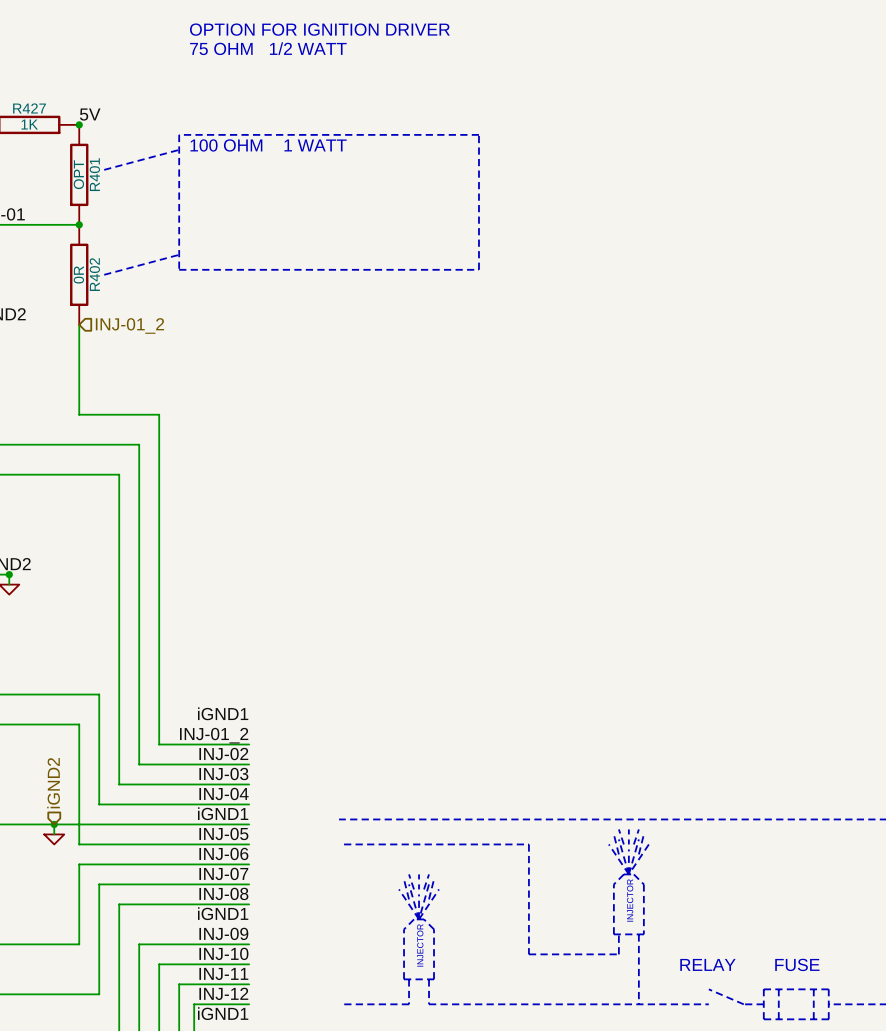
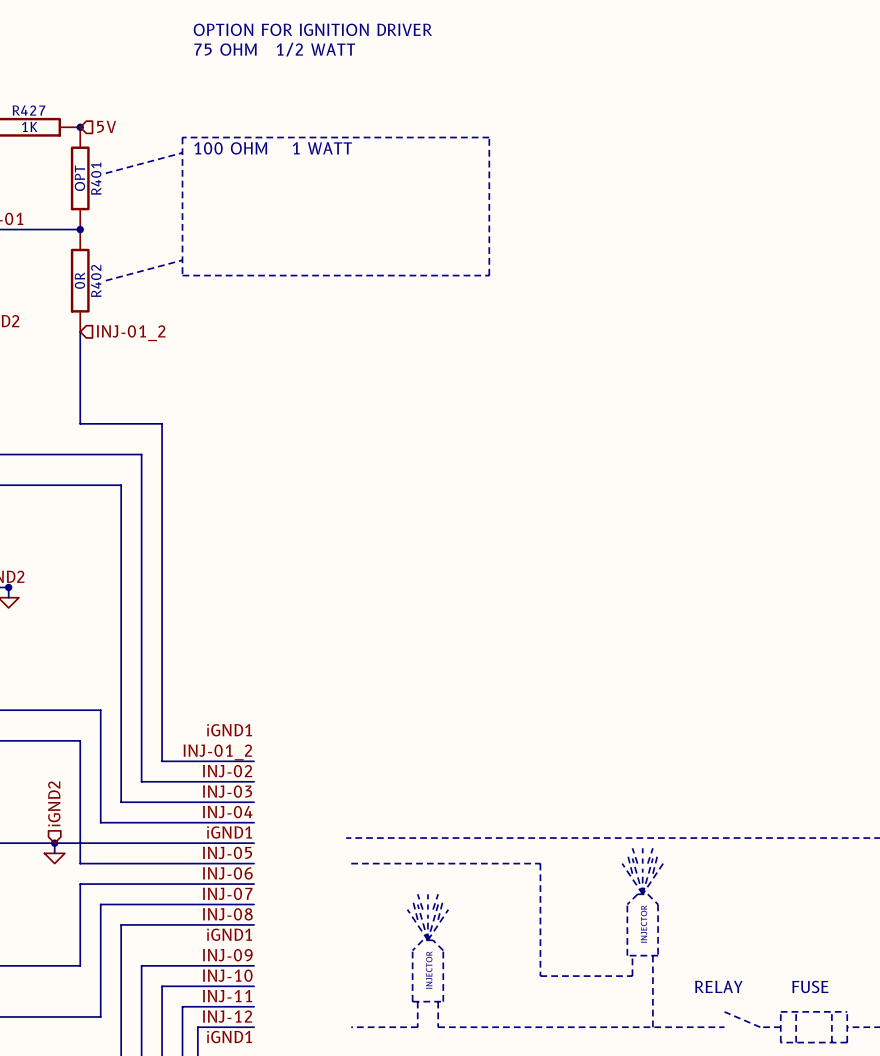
label: 5V (90, 114) -> none
hierarchical label: none -> 5V (106, 126)

